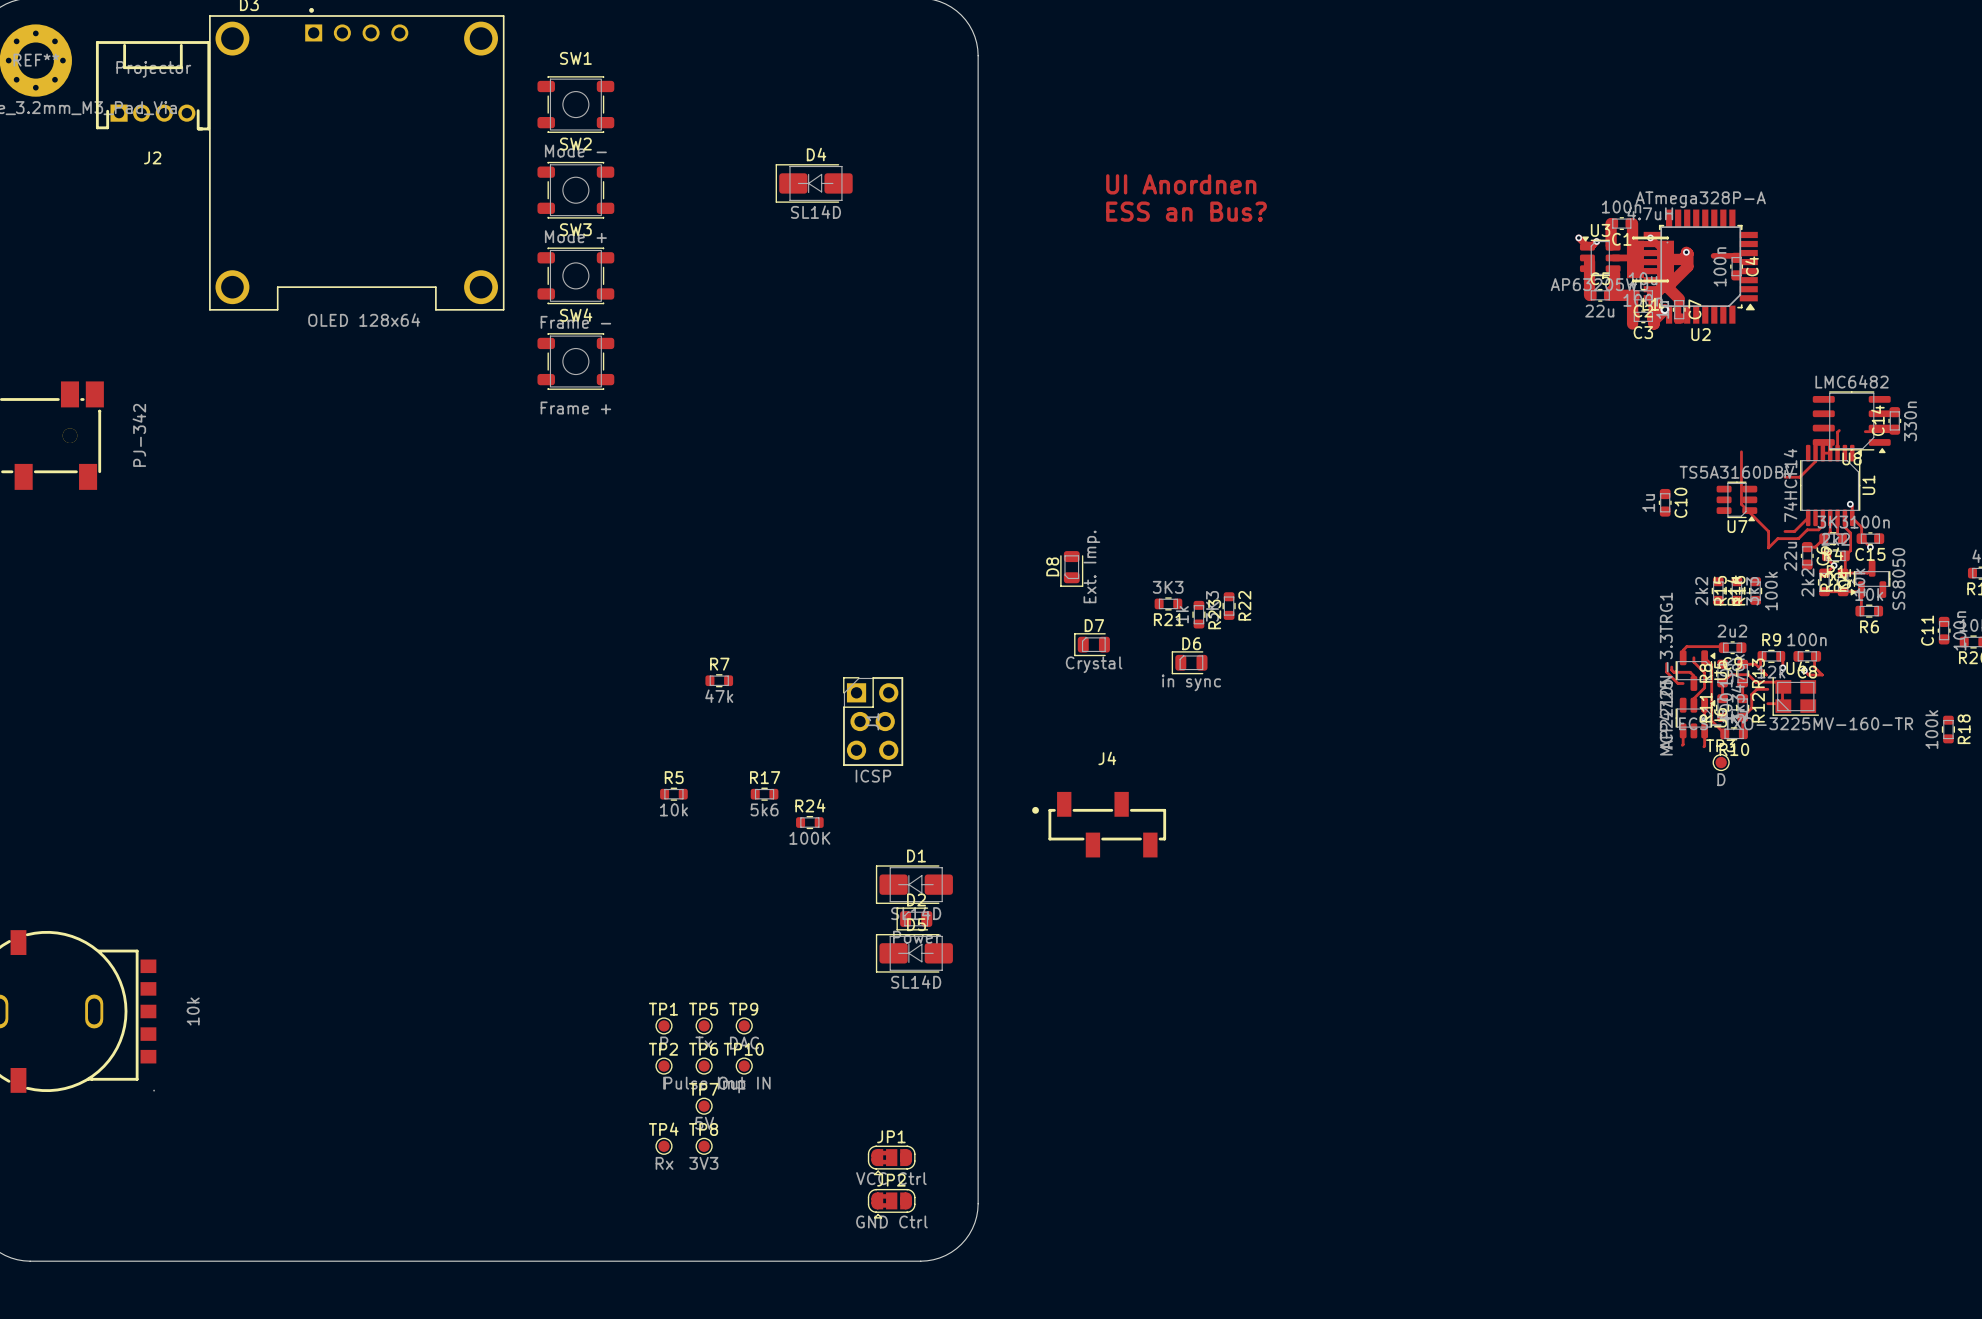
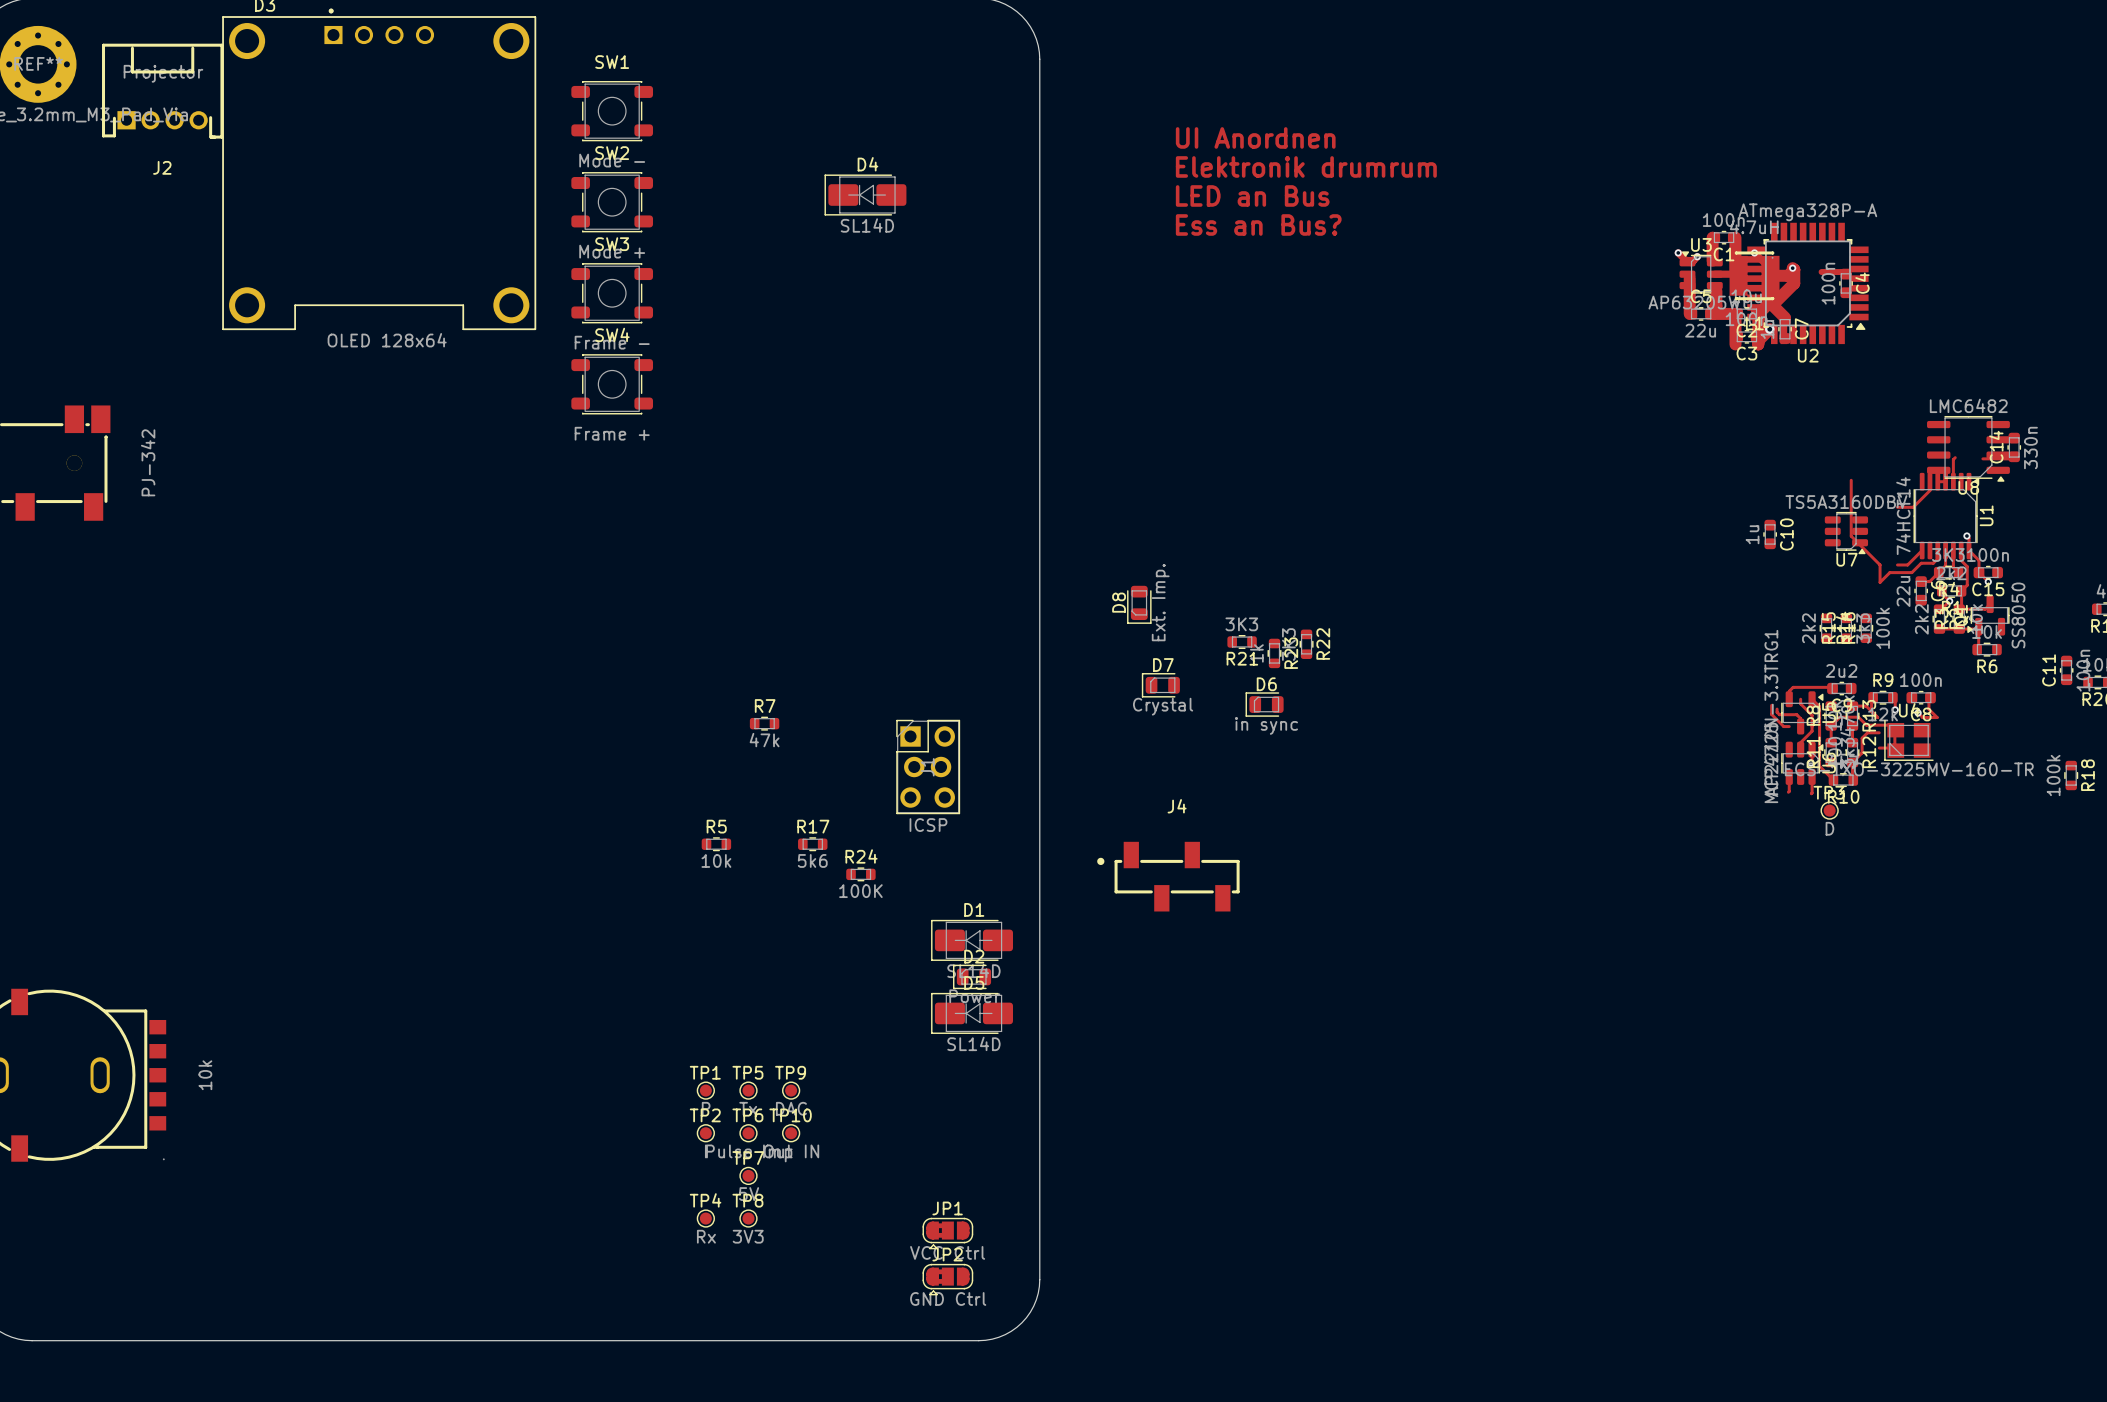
text: none -> UI Anordnen (1255, 137)
text: none -> Elektronik drumrum (1306, 166)
text: UI Anordnen (1181, 184) -> LED an Bus (1252, 195)
text: ESS an Bus? (1186, 211) -> Ess an Bus? (1258, 224)

